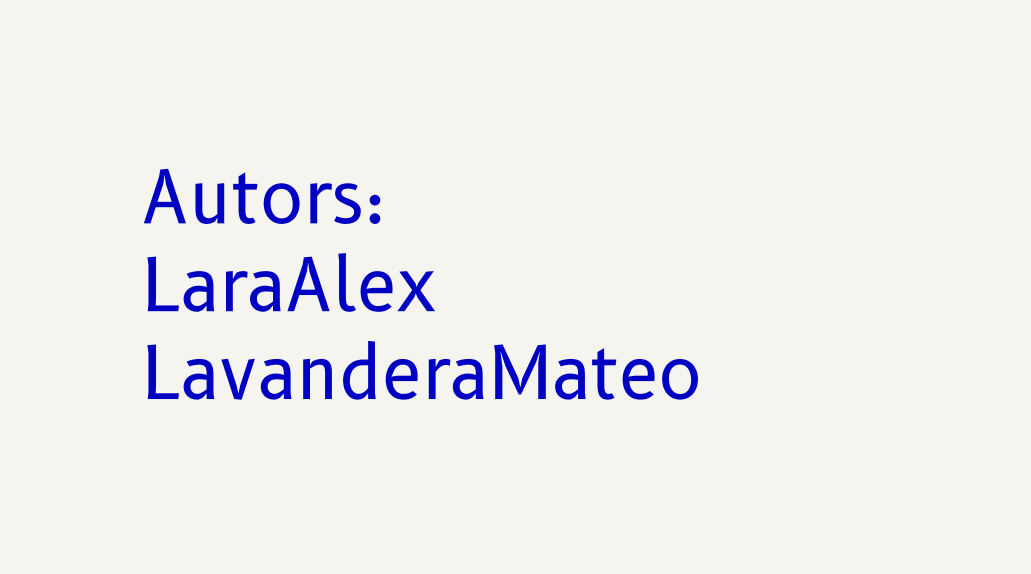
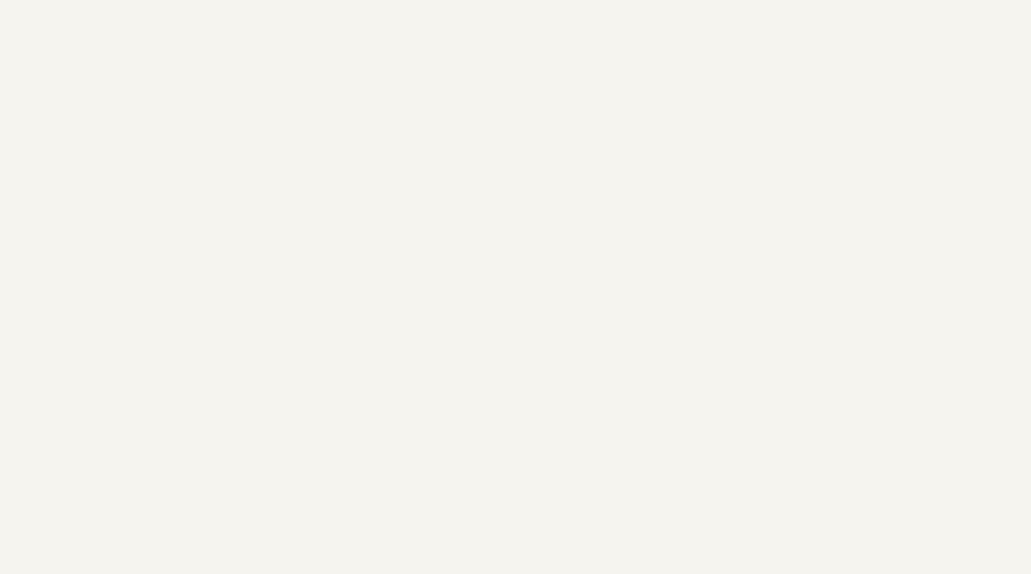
text: Autors: (262, 196) -> none
text: LaraAlex (291, 282) -> none
text: LavanderaMateo (422, 370) -> none

